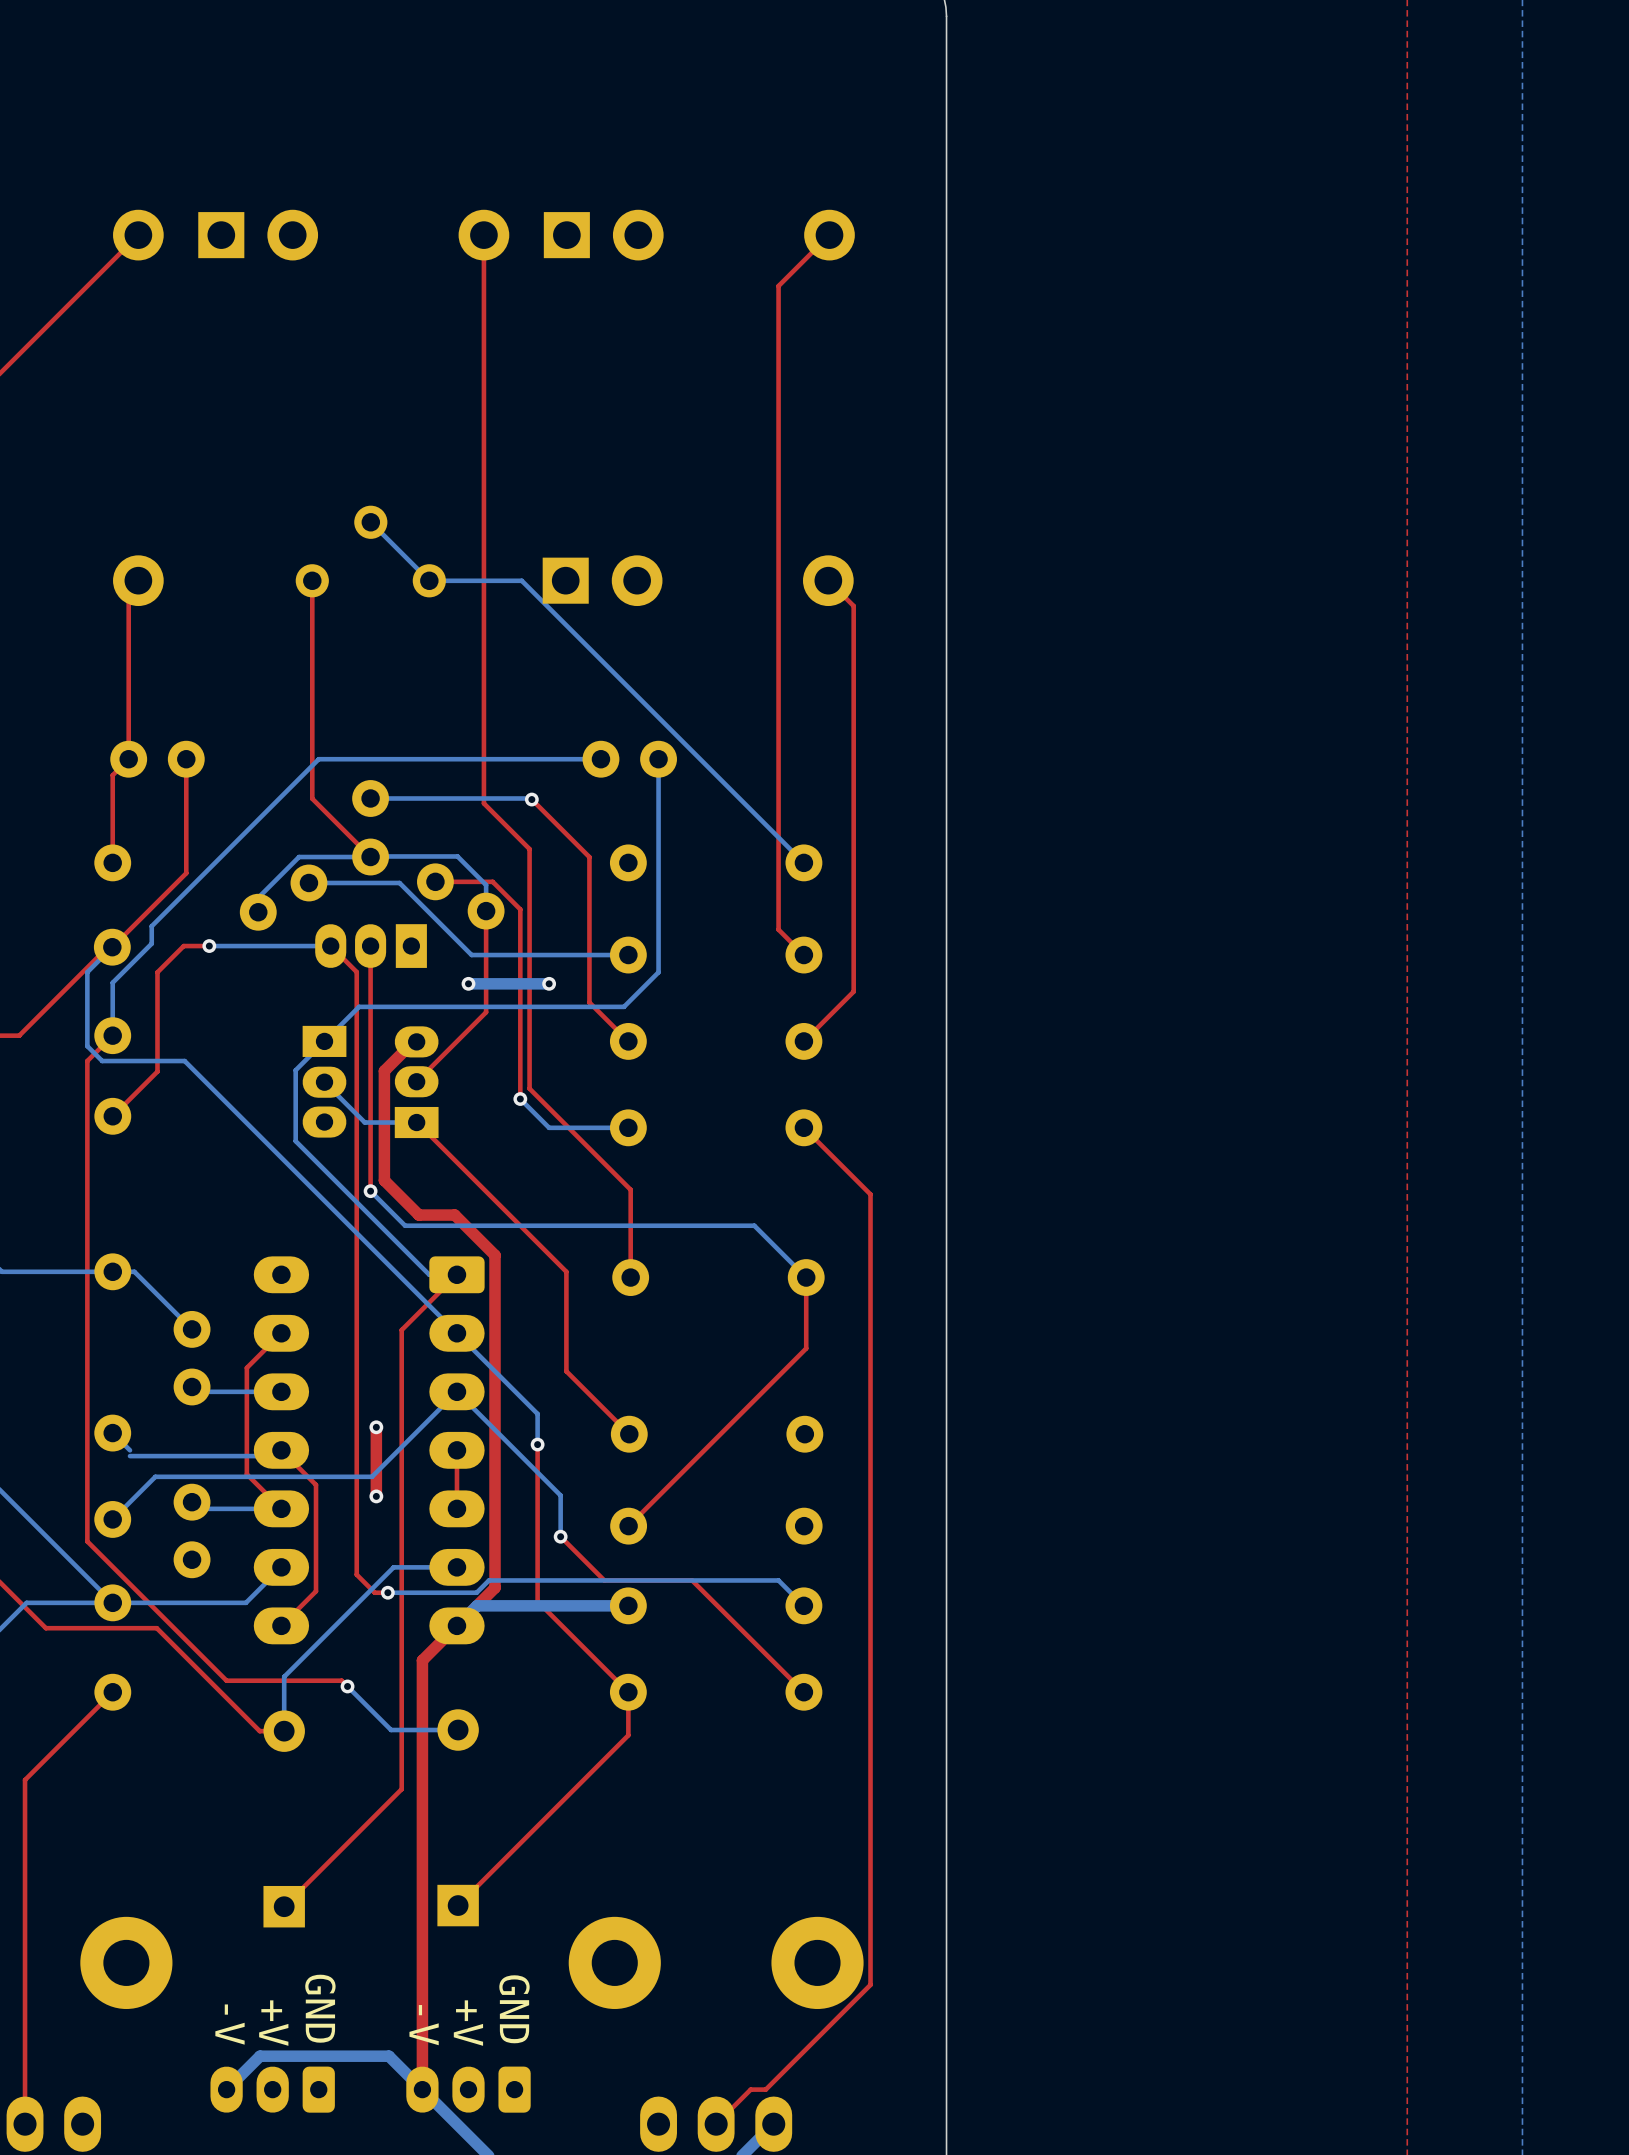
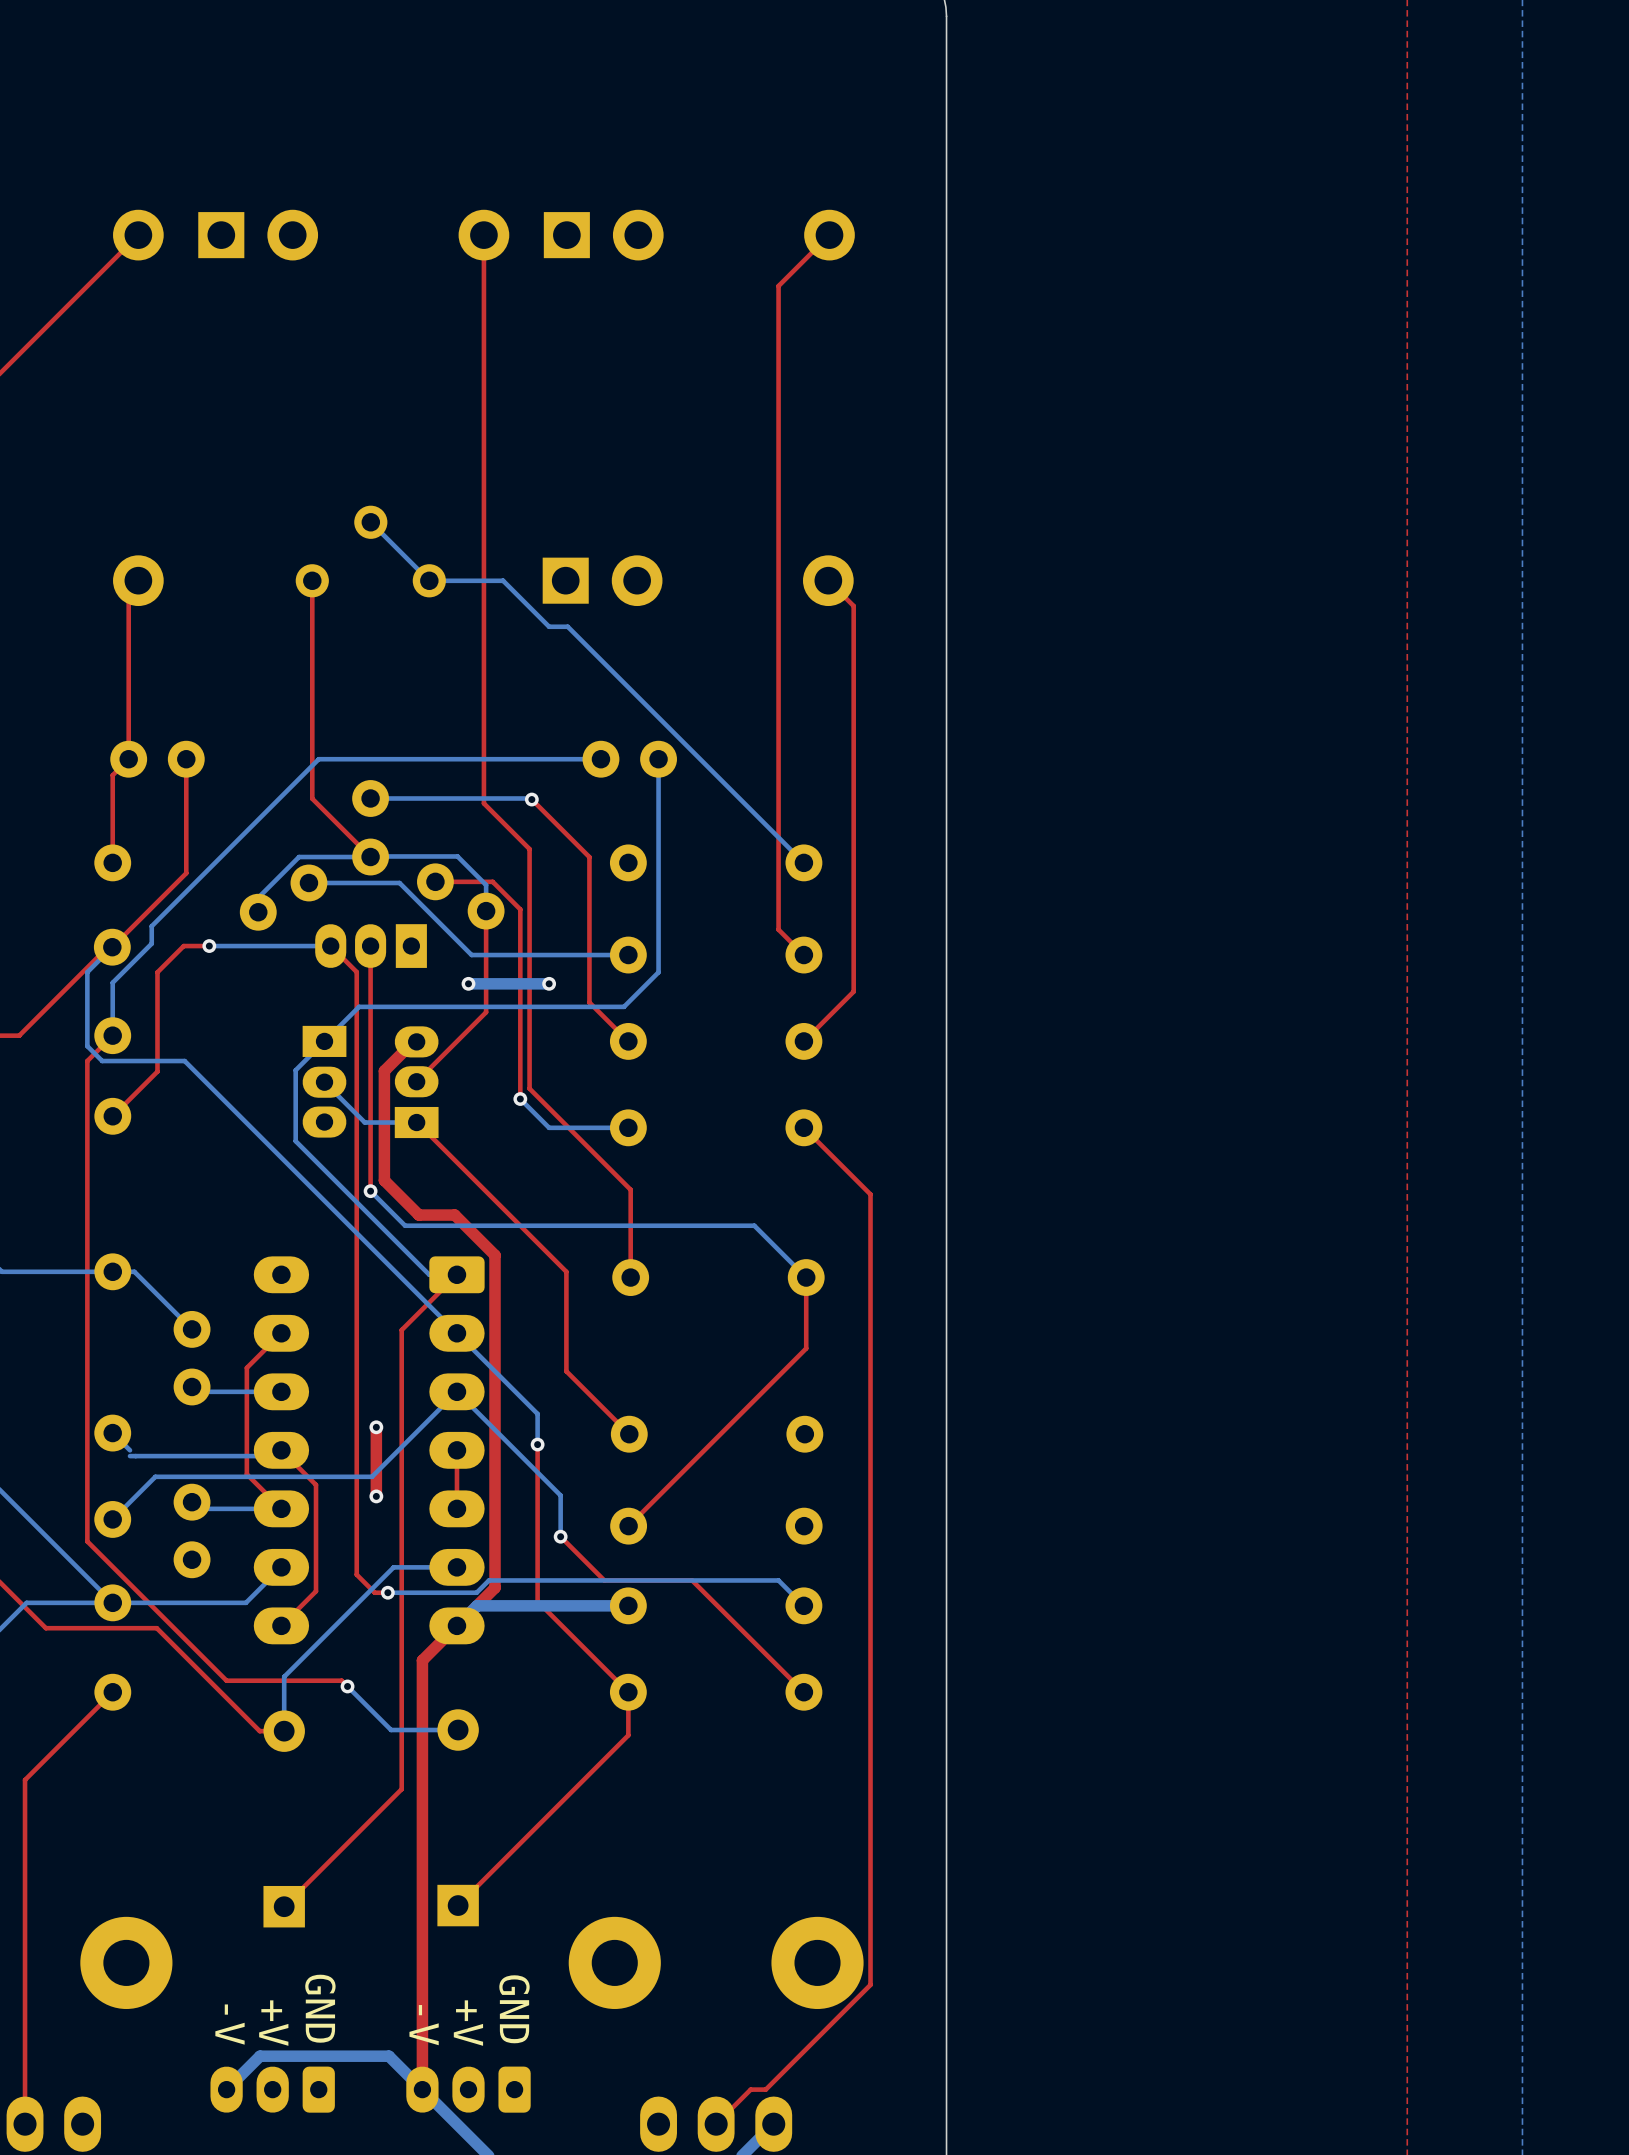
bottom track: (502, 580) (521, 580) (567, 626) -> (503, 580) (549, 626) (567, 626)

